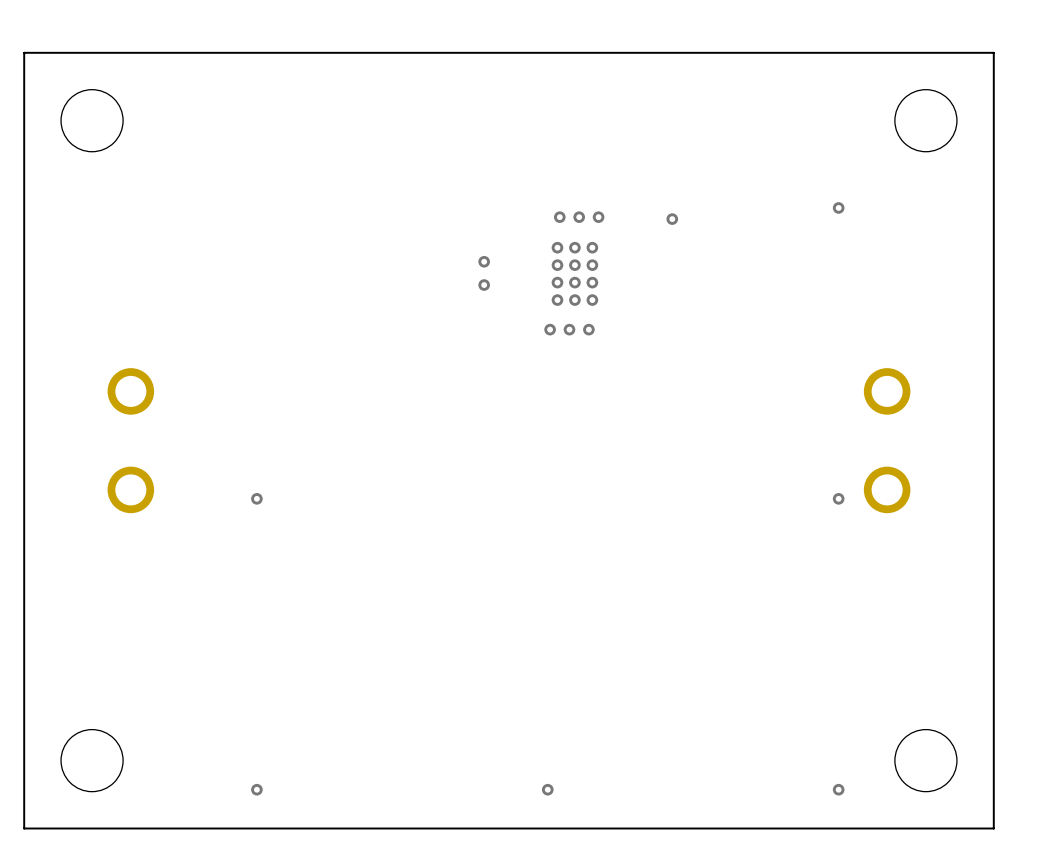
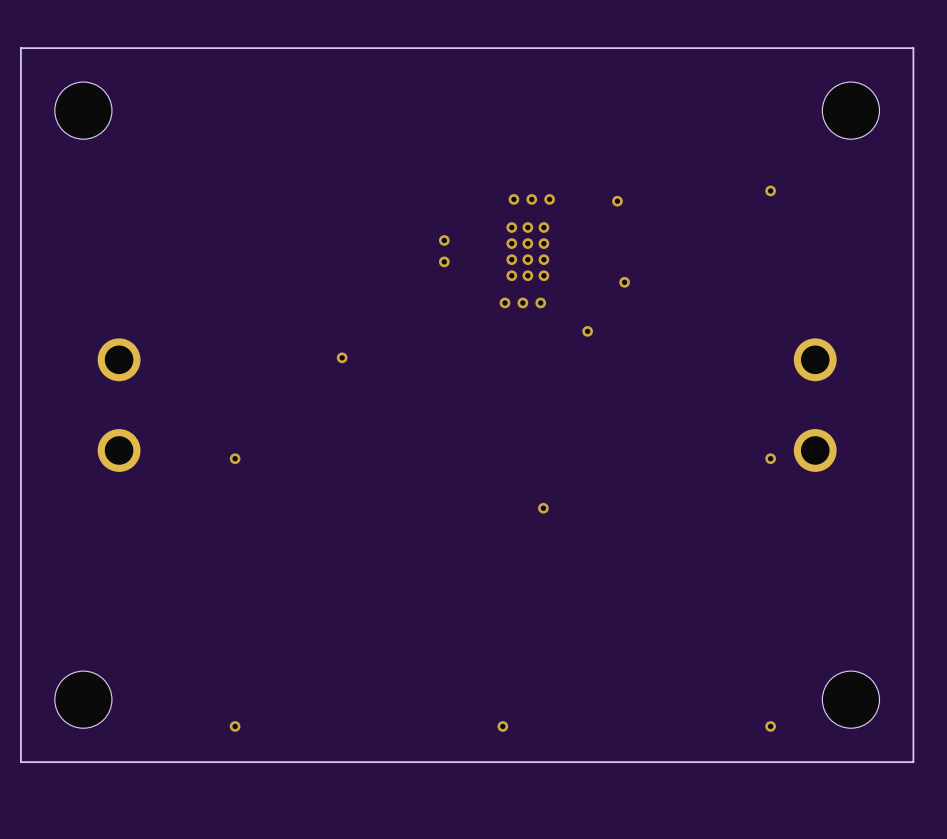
via: none -> (624, 282)
via: none -> (587, 331)
via: none -> (342, 357)
via: none -> (543, 508)

